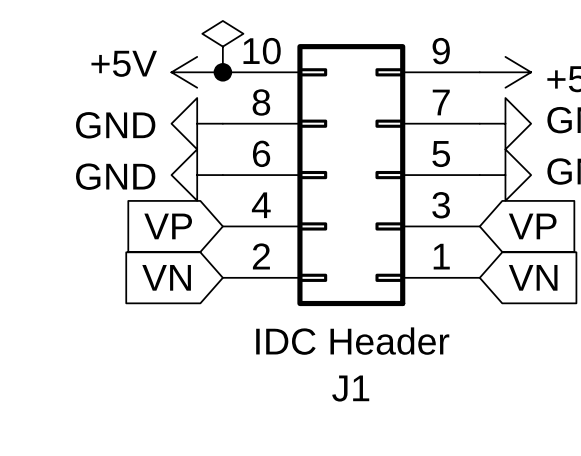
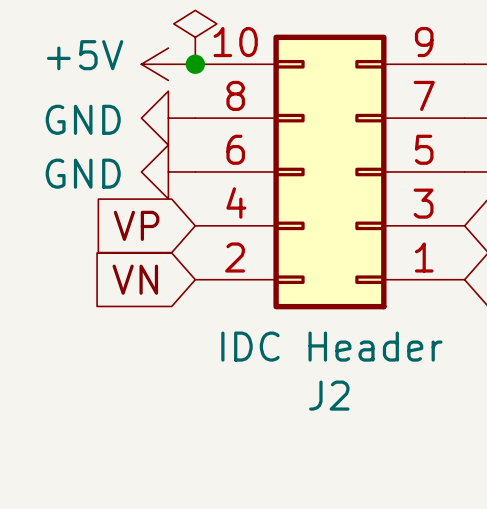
J1 name: J1 (350, 388) -> J2 (329, 395)

